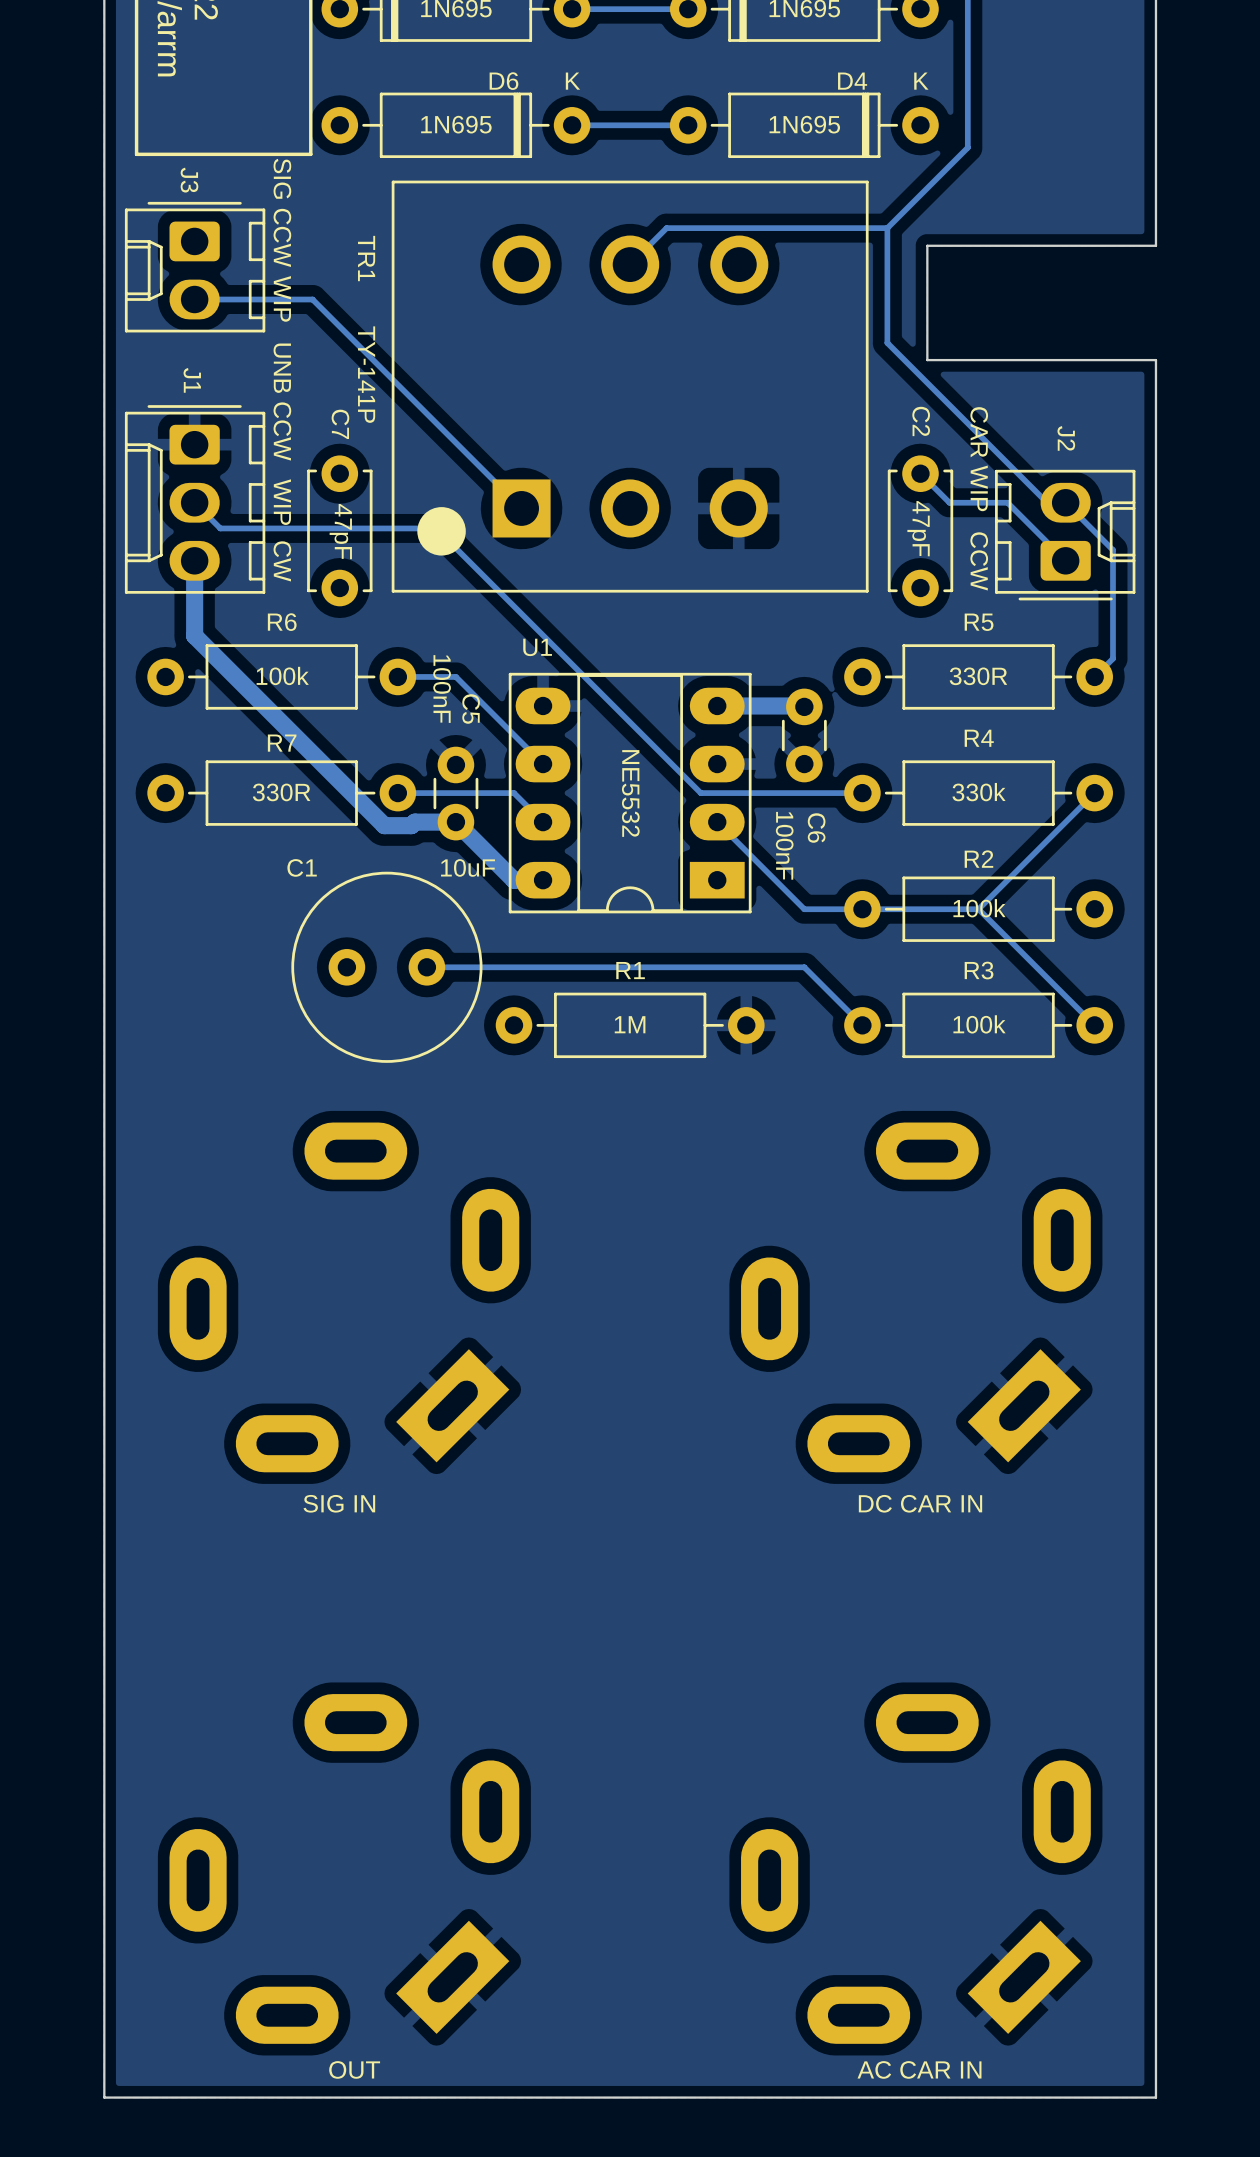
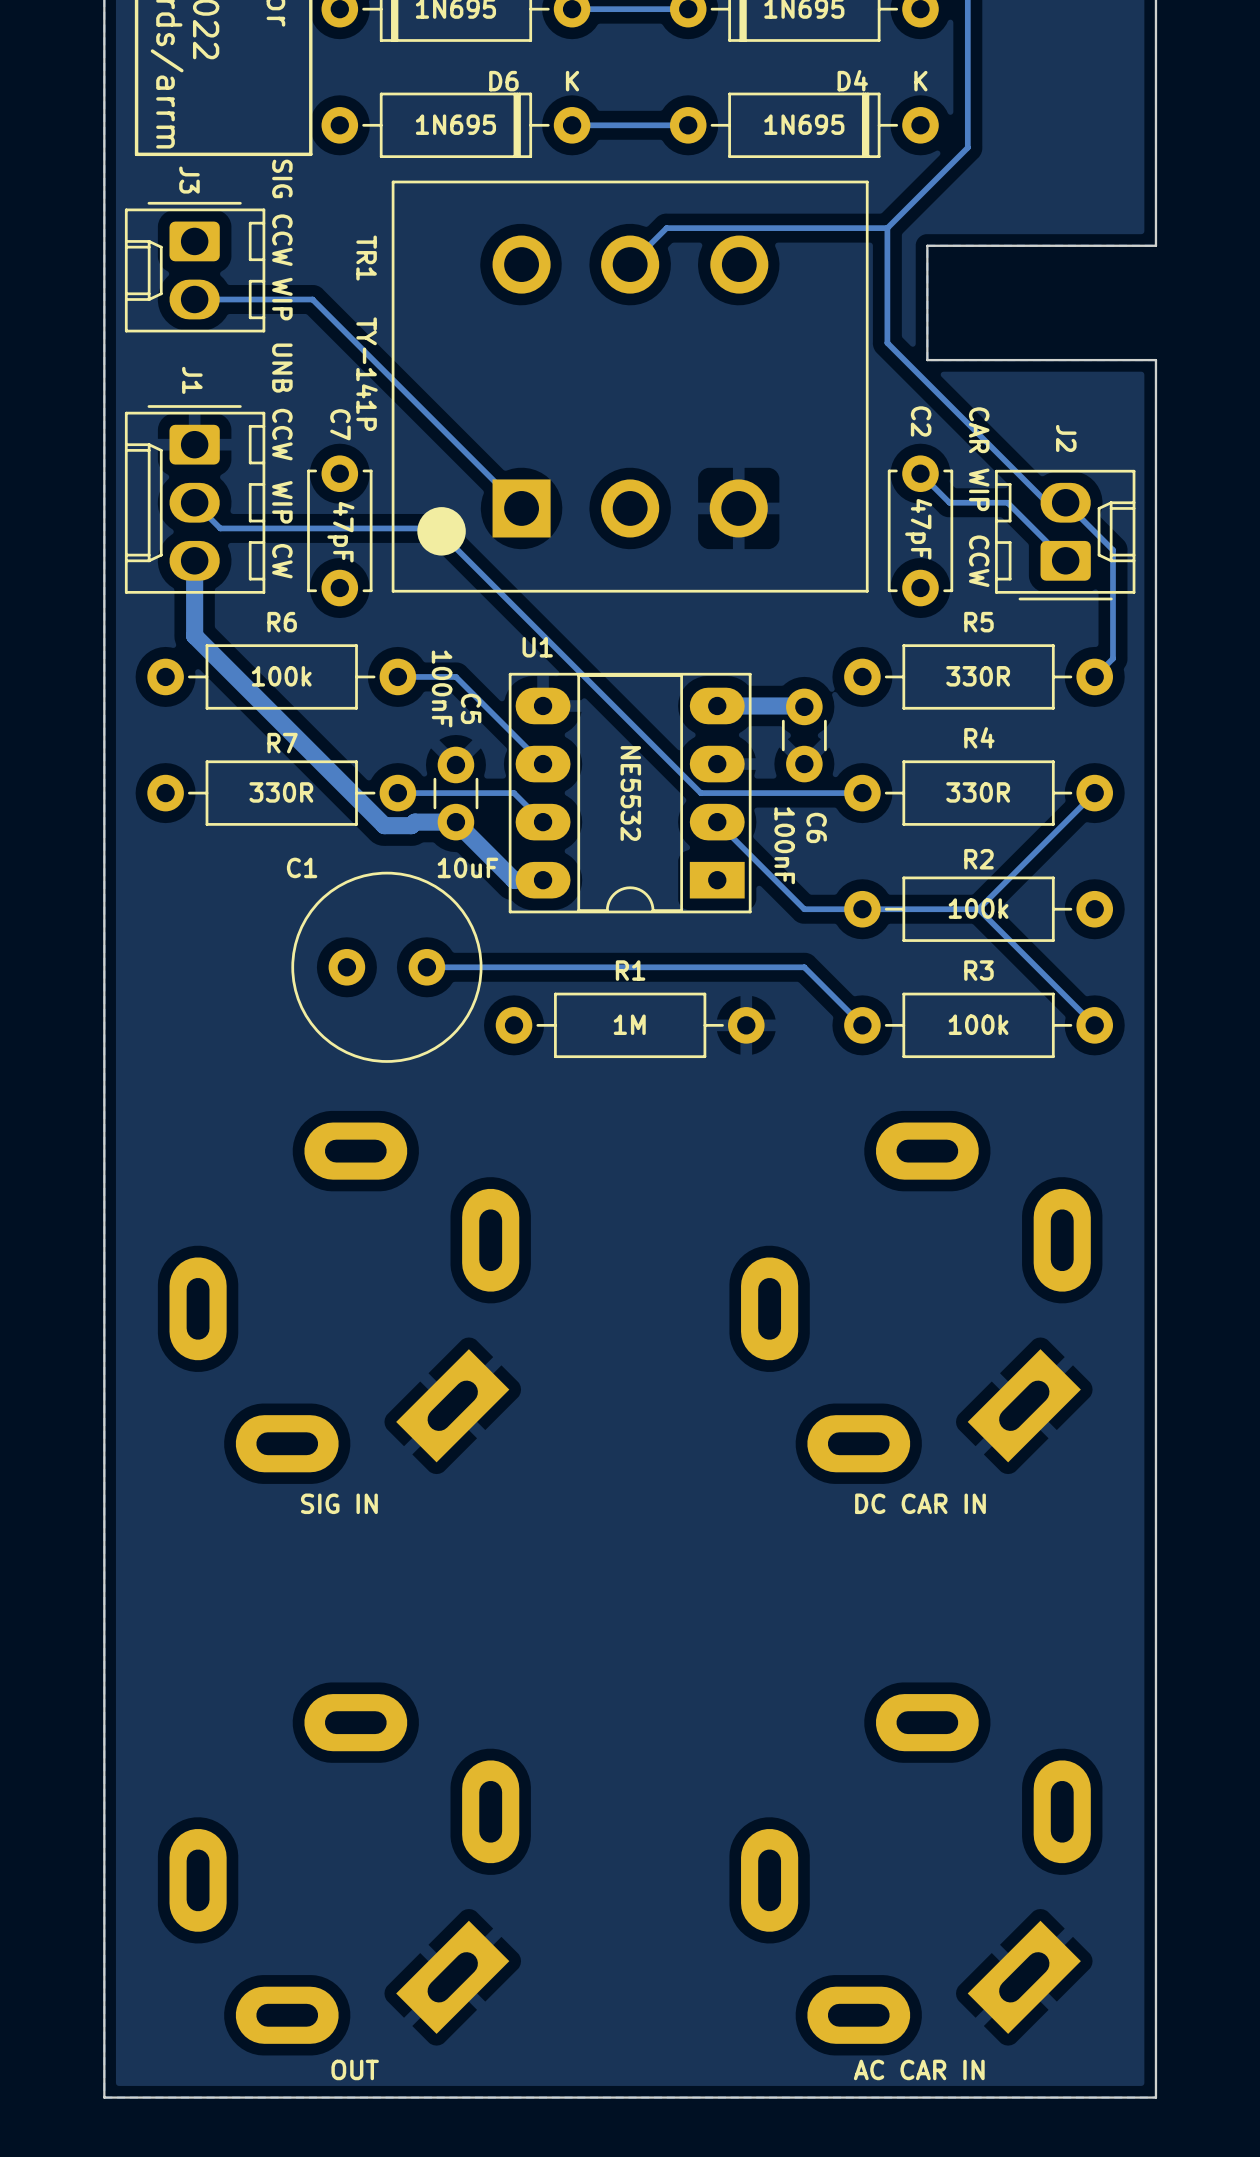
R4 value: 330k (979, 792) -> 330R (978, 792)

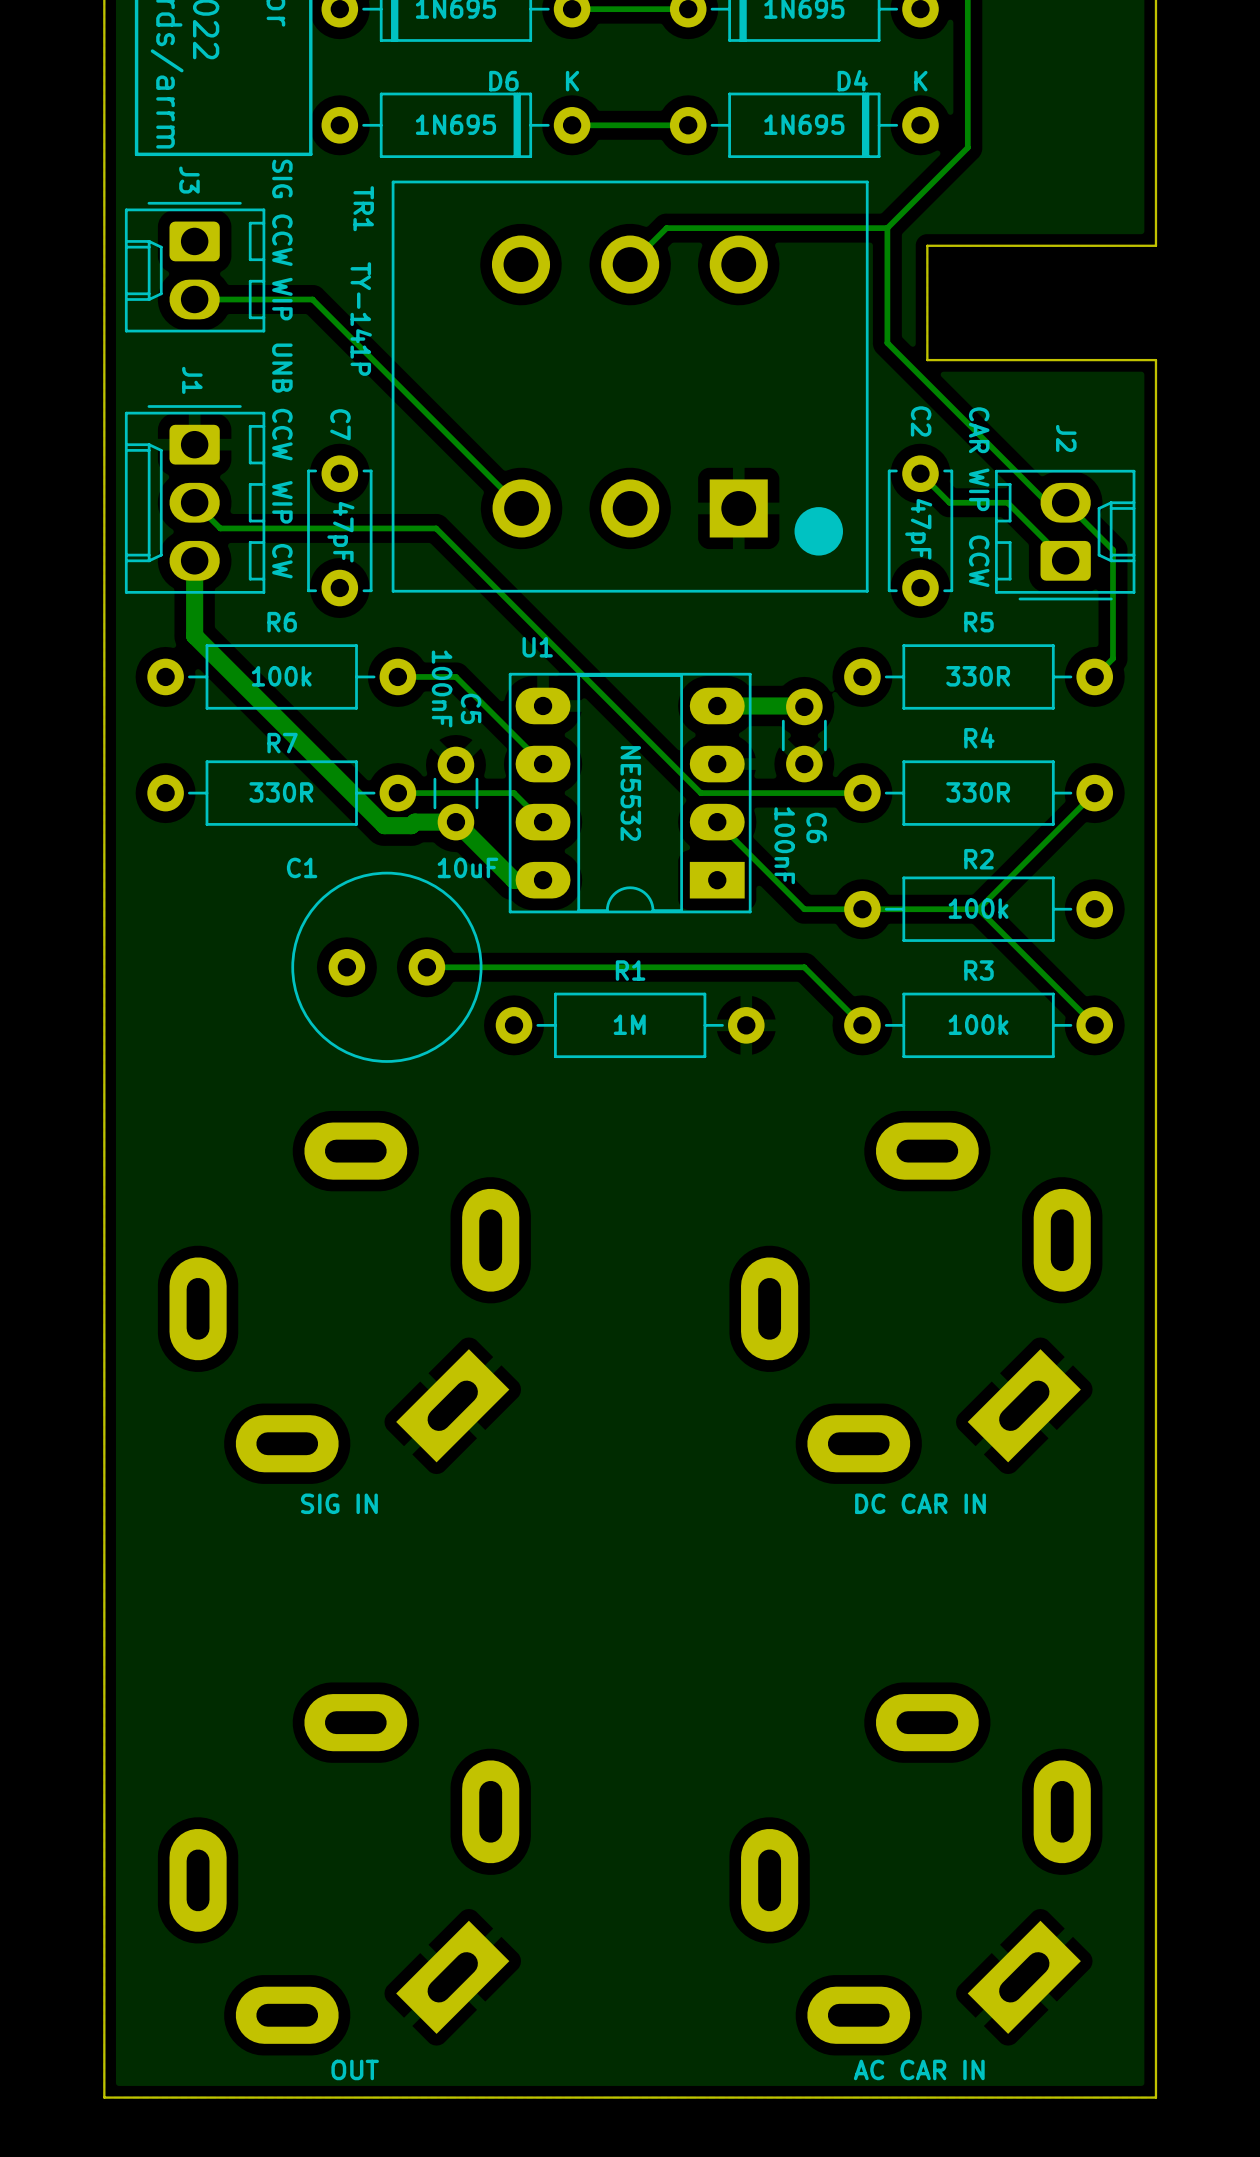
TR1 footprint: [391, 180, 869, 593] -> [391, 180, 869, 593]
TR1 name position: TR1 (366, 258) -> TR1 (363, 208)
TR1 value position: TY-141P (366, 374) -> TY-141P (361, 319)

